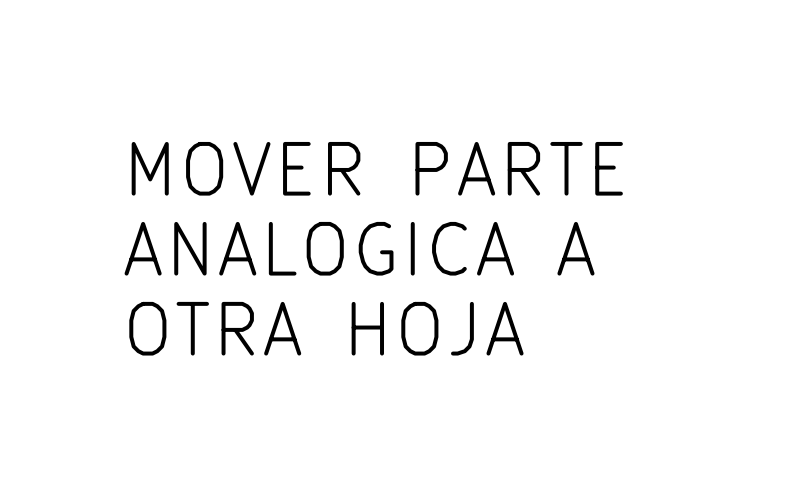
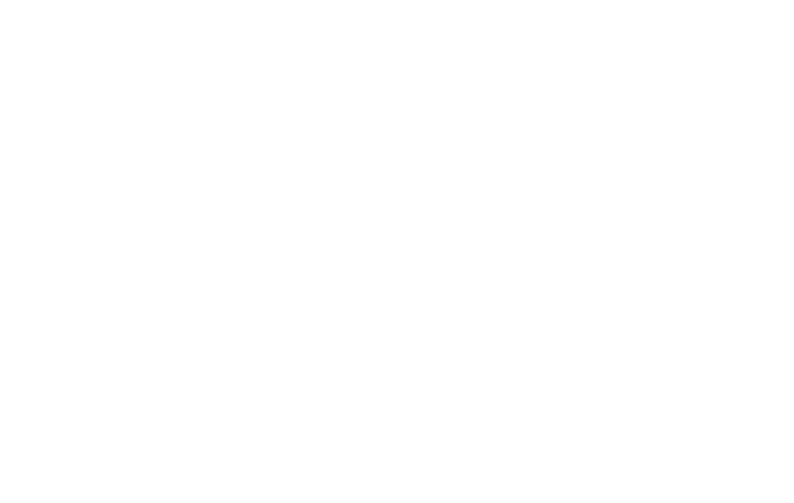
text: MOVER PARTE (377, 168) -> none
text: ANALOGICA A (359, 248) -> none
text: OTRA HOJA (326, 328) -> none

